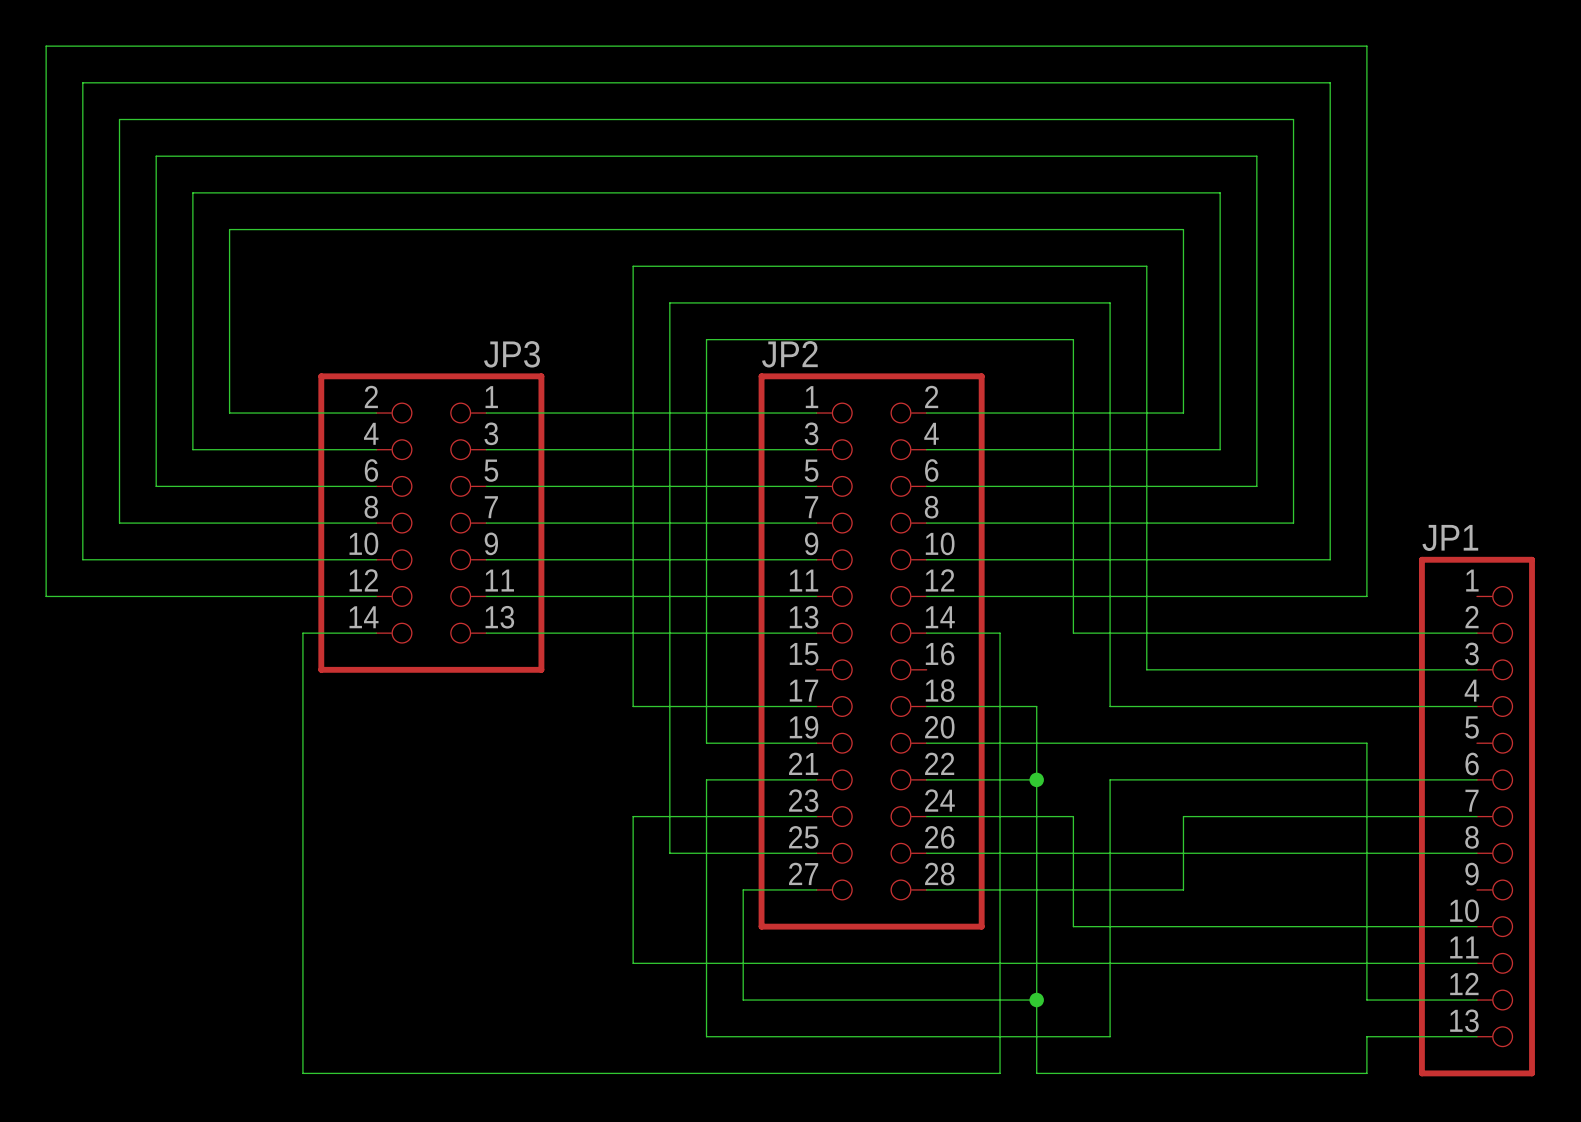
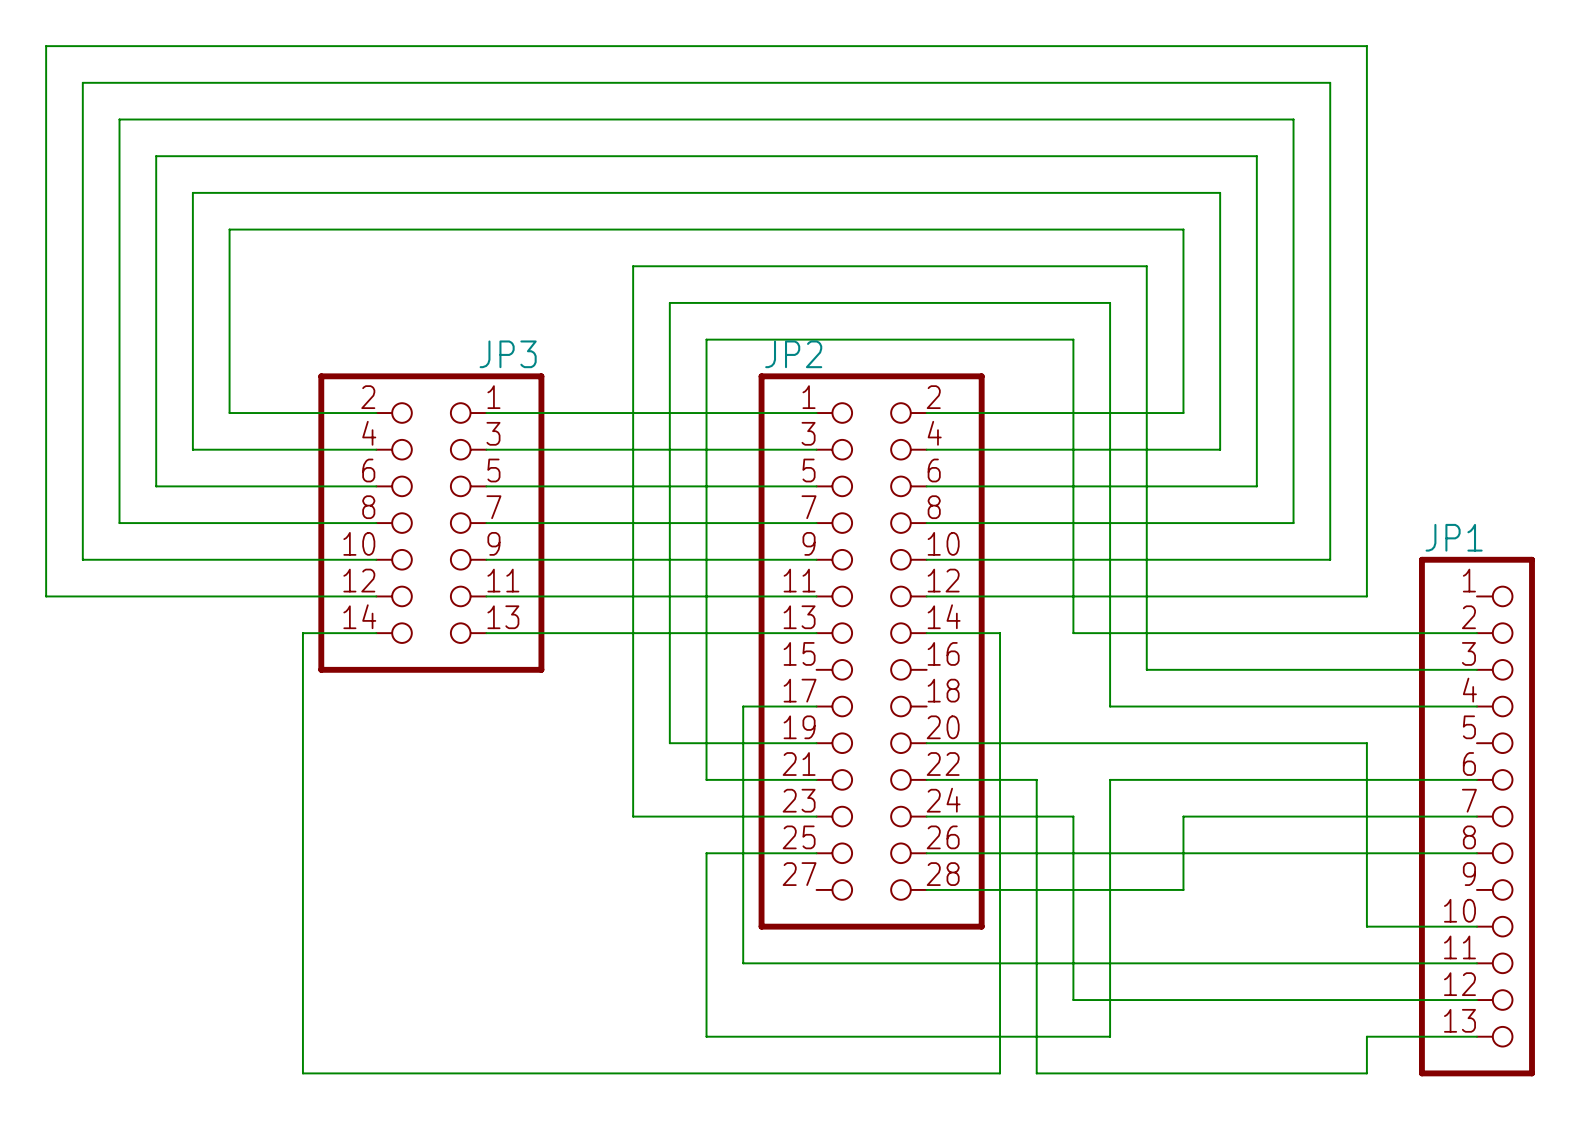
wire: (633, 706) (743, 706) -> (633, 706) (633, 816)
wire: (926, 706) (1036, 706) (1036, 779) -> none
wire: (669, 743) (669, 853) (706, 853) (706, 779) -> (669, 743) (706, 743) (706, 779)
junction: (1036, 779) -> none
wire: (633, 816) (633, 963) (743, 963) (743, 1000) (1036, 1000) -> none
wire: (743, 889) (816, 889) -> (743, 889) (743, 706)
wire: (1073, 926) (1366, 926) (1366, 1000) -> (1073, 926) (1073, 1000) (1366, 1000)
junction: (1036, 1000) -> none

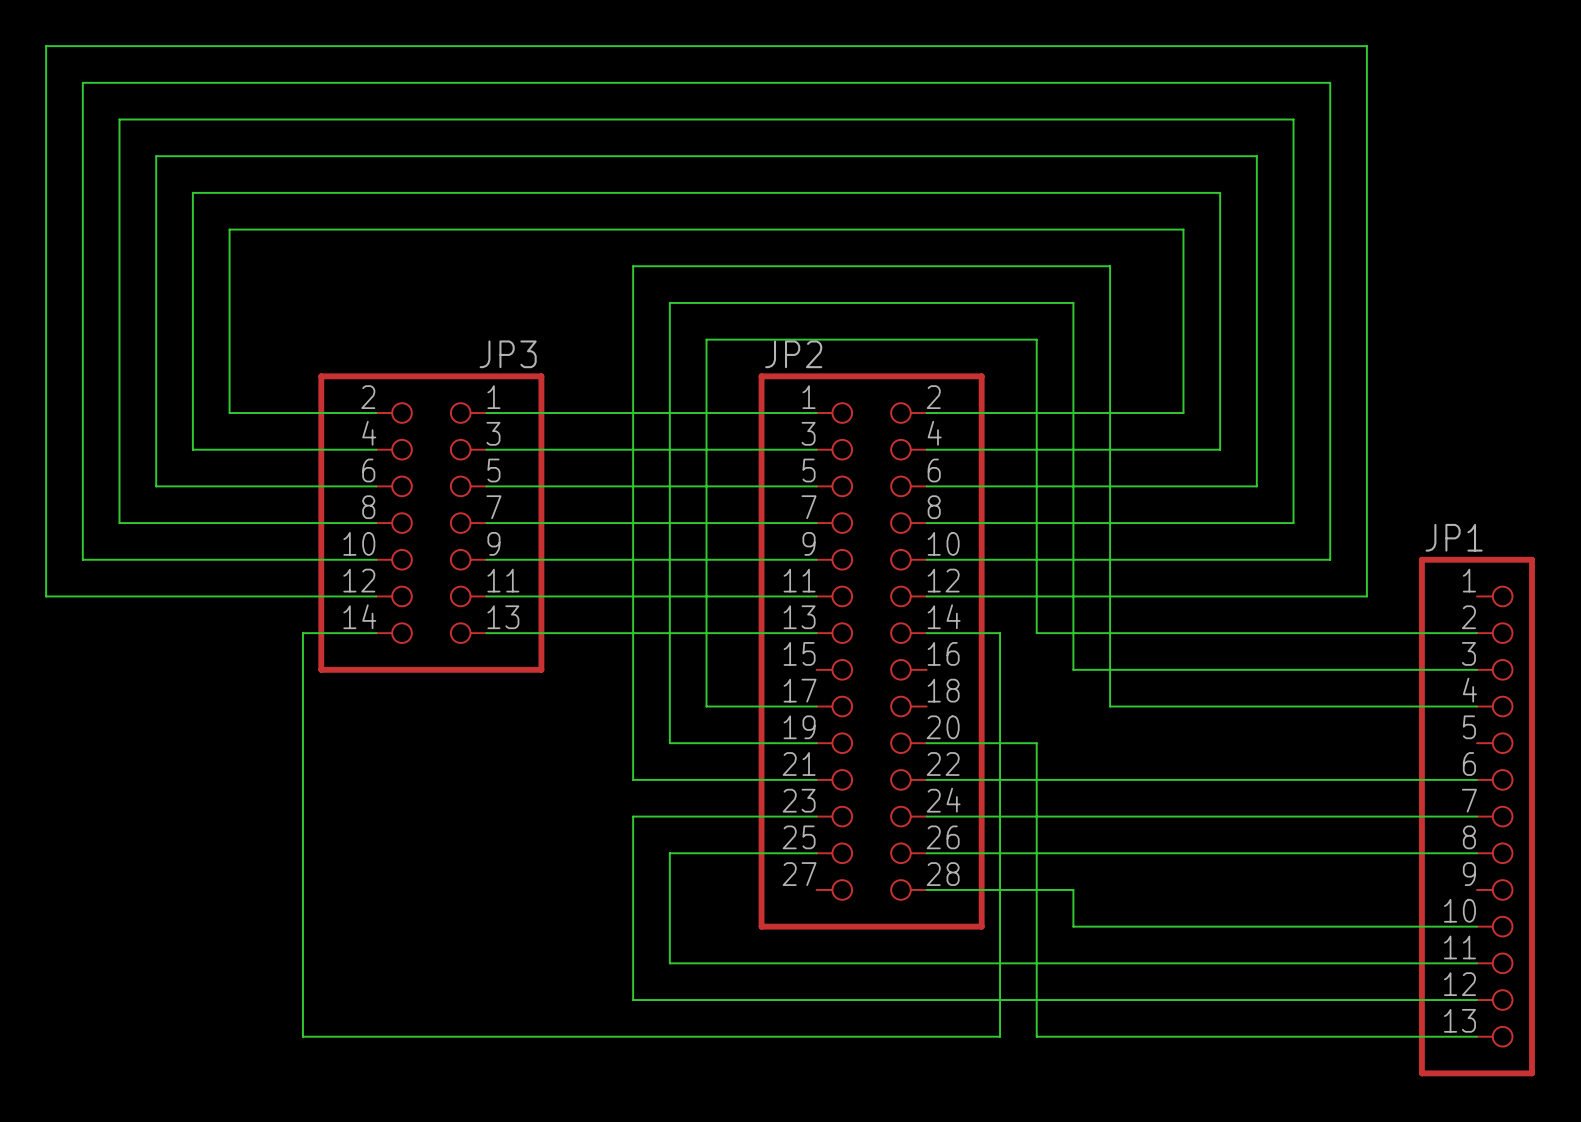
wire: (1110, 266) (1146, 266) (1146, 669) -> (1036, 339) (1036, 633) (1073, 633) (1073, 669) (1146, 669)
wire: none -> (1110, 266) (1110, 302)
wire: (1073, 302) (1110, 302) -> (1073, 302) (1073, 339)
wire: (1036, 339) (1073, 339) -> none
wire: (706, 706) (706, 779) -> (706, 706) (743, 706)
wire: (743, 706) (743, 963) -> none
wire: (1036, 743) (1366, 743) (1366, 926) -> (1073, 926) (1366, 926)
wire: (633, 779) (633, 816) -> (633, 779) (706, 779)
wire: (1110, 779) (1110, 1036) -> (1110, 779) (1036, 779) (1036, 743)
wire: (1073, 816) (1073, 889) (1183, 889) (1183, 816) -> (1073, 816) (1183, 816)
wire: (706, 853) (706, 1036) -> (706, 853) (669, 853) (669, 963) (743, 963)
wire: (1073, 926) (1073, 1000) -> (633, 816) (633, 1000) (1073, 1000)
wire: (302, 1036) (302, 1073) (1000, 1073) (1000, 1036) (1036, 1036) (1036, 1073) (1366, 1073) (1366, 1036) -> (302, 1036) (706, 1036)
wire: none -> (1110, 1036) (1366, 1036)

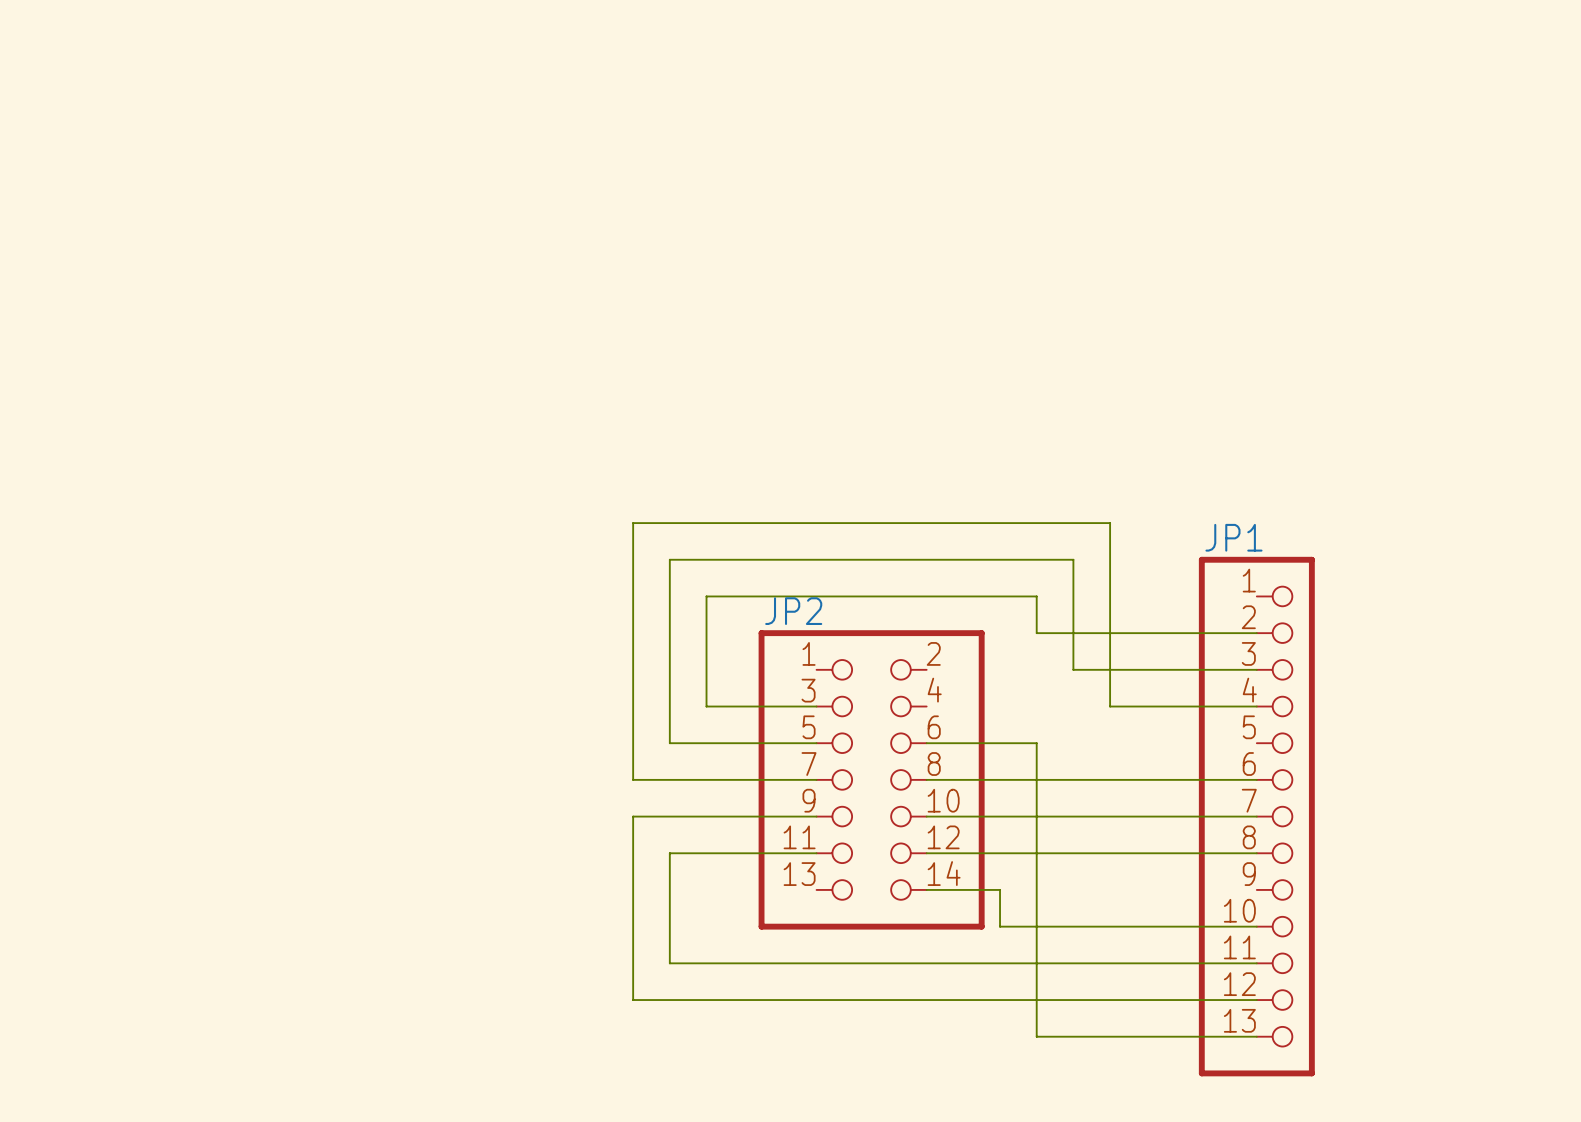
JP2 name position: JP2 (793, 354) -> JP2 (793, 611)
JP2 symbol: [758, 373, 985, 930] -> [758, 630, 985, 930]
wire: (376, 413) (229, 413) (229, 229) (1183, 229) (1183, 413) (926, 413) -> none
wire: (486, 413) (816, 413) -> none
wire: (376, 449) (192, 449) (192, 192) (1220, 192) (1220, 449) (926, 449) -> none
wire: (486, 449) (816, 449) -> none
wire: (376, 486) (156, 486) (156, 156) (1256, 156) (1256, 486) (926, 486) -> none
wire: (486, 486) (816, 486) -> none
wire: (376, 523) (119, 523) (119, 119) (1293, 119) (1293, 523) (1110, 523) (1110, 266) (633, 266) (633, 523) (486, 523) -> none
JP3: (431, 523) -> none
wire: none -> (816, 523) (926, 523)
wire: (376, 559) (82, 559) (82, 82) (1330, 82) (1330, 559) (1073, 559) (1073, 302) (669, 302) (669, 559) (486, 559) -> none
wire: none -> (816, 559) (926, 559)
wire: (376, 596) (46, 596) (46, 46) (1366, 46) (1366, 596) (1036, 596) (1036, 339) (706, 339) (706, 596) (486, 596) -> none
wire: none -> (816, 596) (926, 596)
wire: (376, 633) (302, 633) (302, 1036) (1000, 1036) (1000, 926) -> none
wire: (486, 633) (816, 633) -> none
wire: (926, 633) (1000, 633) (1000, 889) (1073, 889) (1073, 926) -> (1000, 926) (1073, 926)
wire: (1256, 633) (1476, 633) -> none
wire: (1256, 669) (1476, 669) -> none
wire: (1256, 706) (1476, 706) -> none
wire: (1256, 779) (1476, 779) -> none
wire: (1256, 816) (1476, 816) -> none
JP1 position: (1476, 816) -> (1256, 816)
wire: (1256, 853) (1476, 853) -> none
wire: (1256, 926) (1476, 926) -> none
wire: (1256, 963) (1476, 963) -> none
wire: (1256, 1000) (1476, 1000) -> none
wire: (1256, 1036) (1476, 1036) -> none

